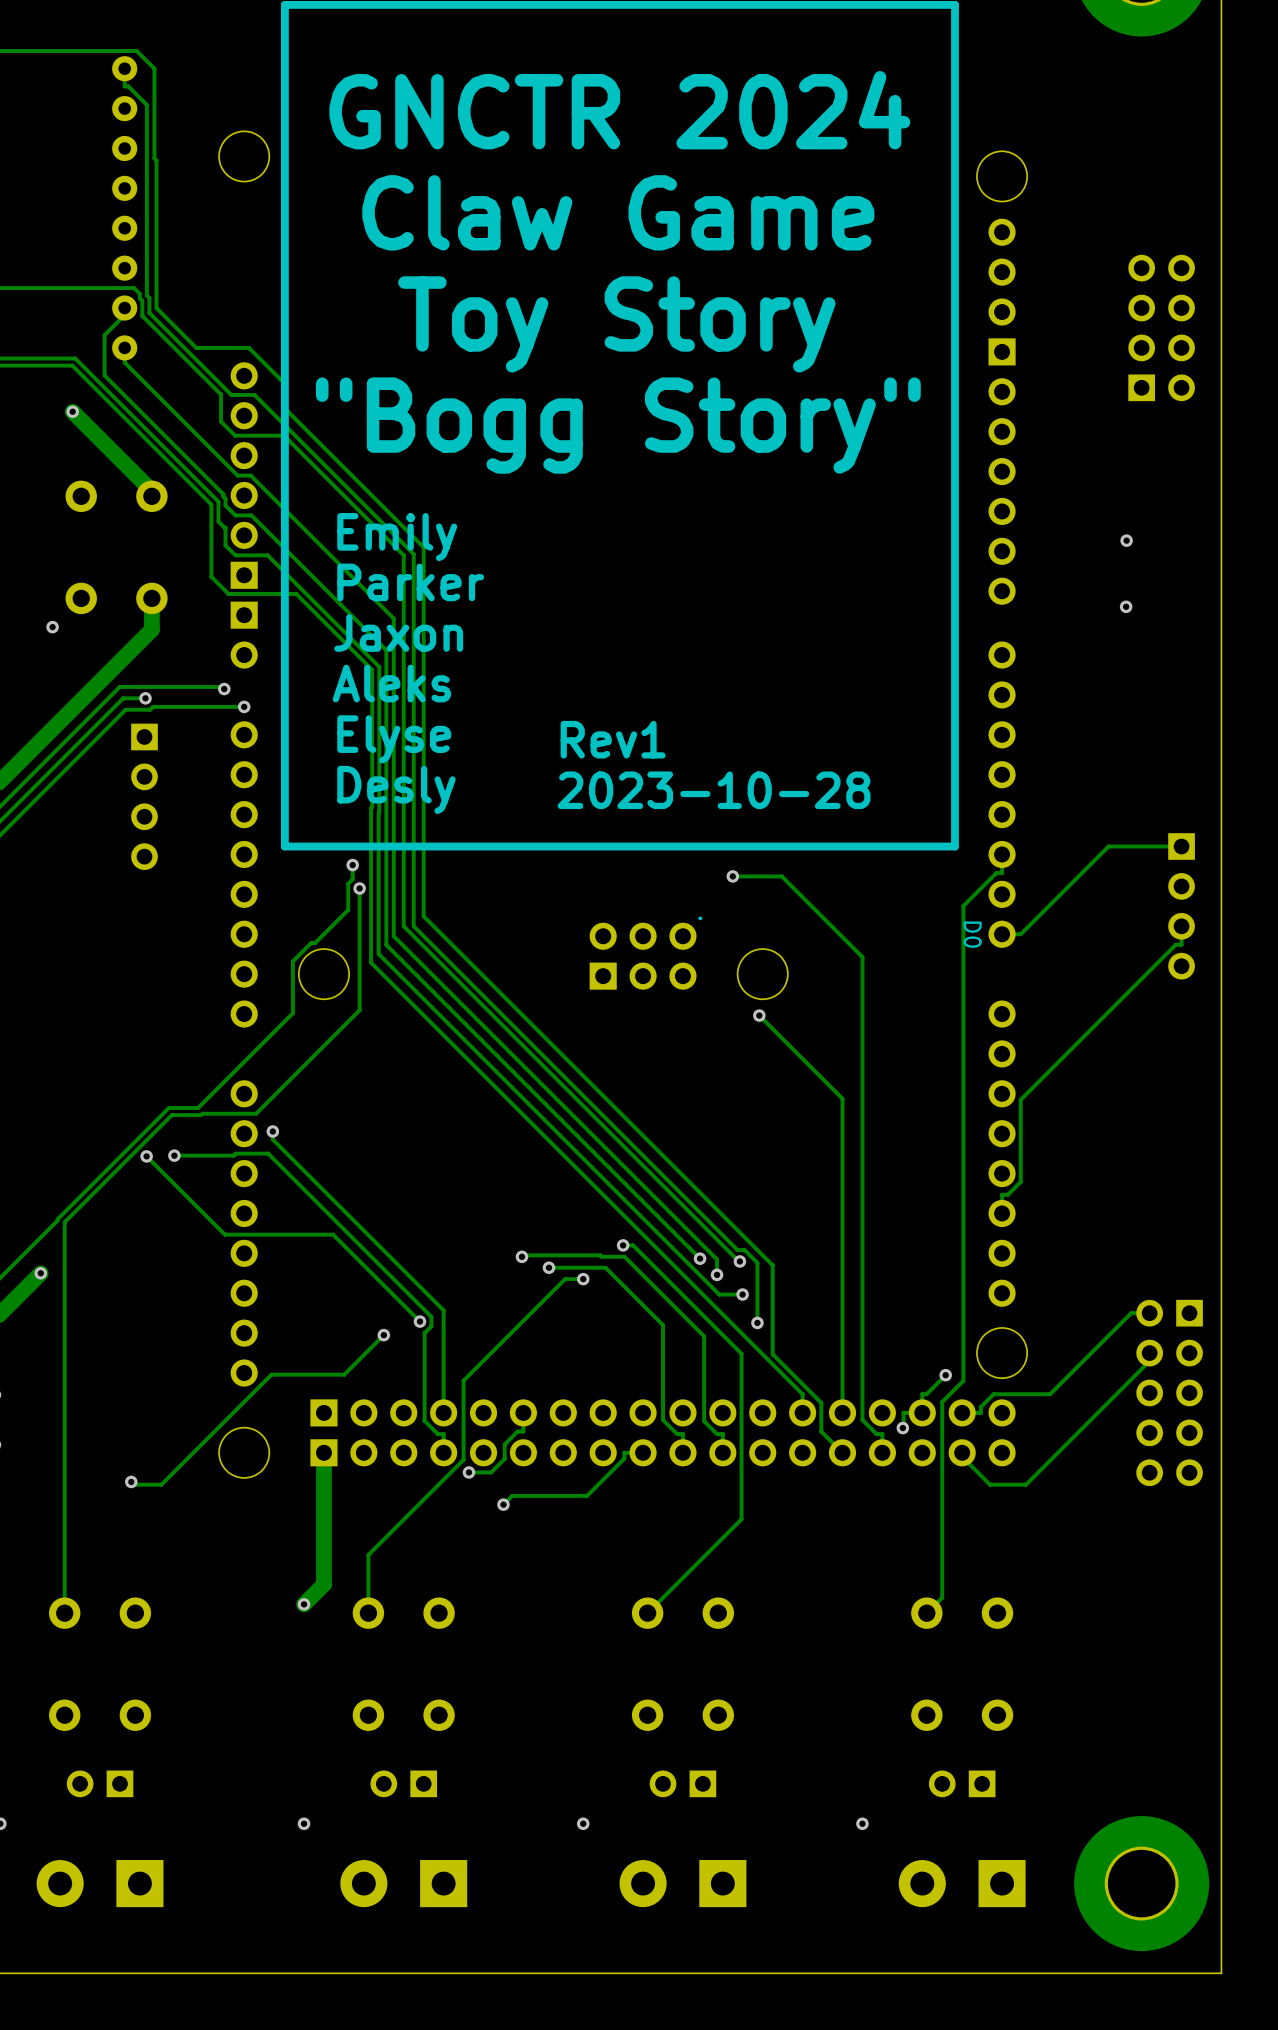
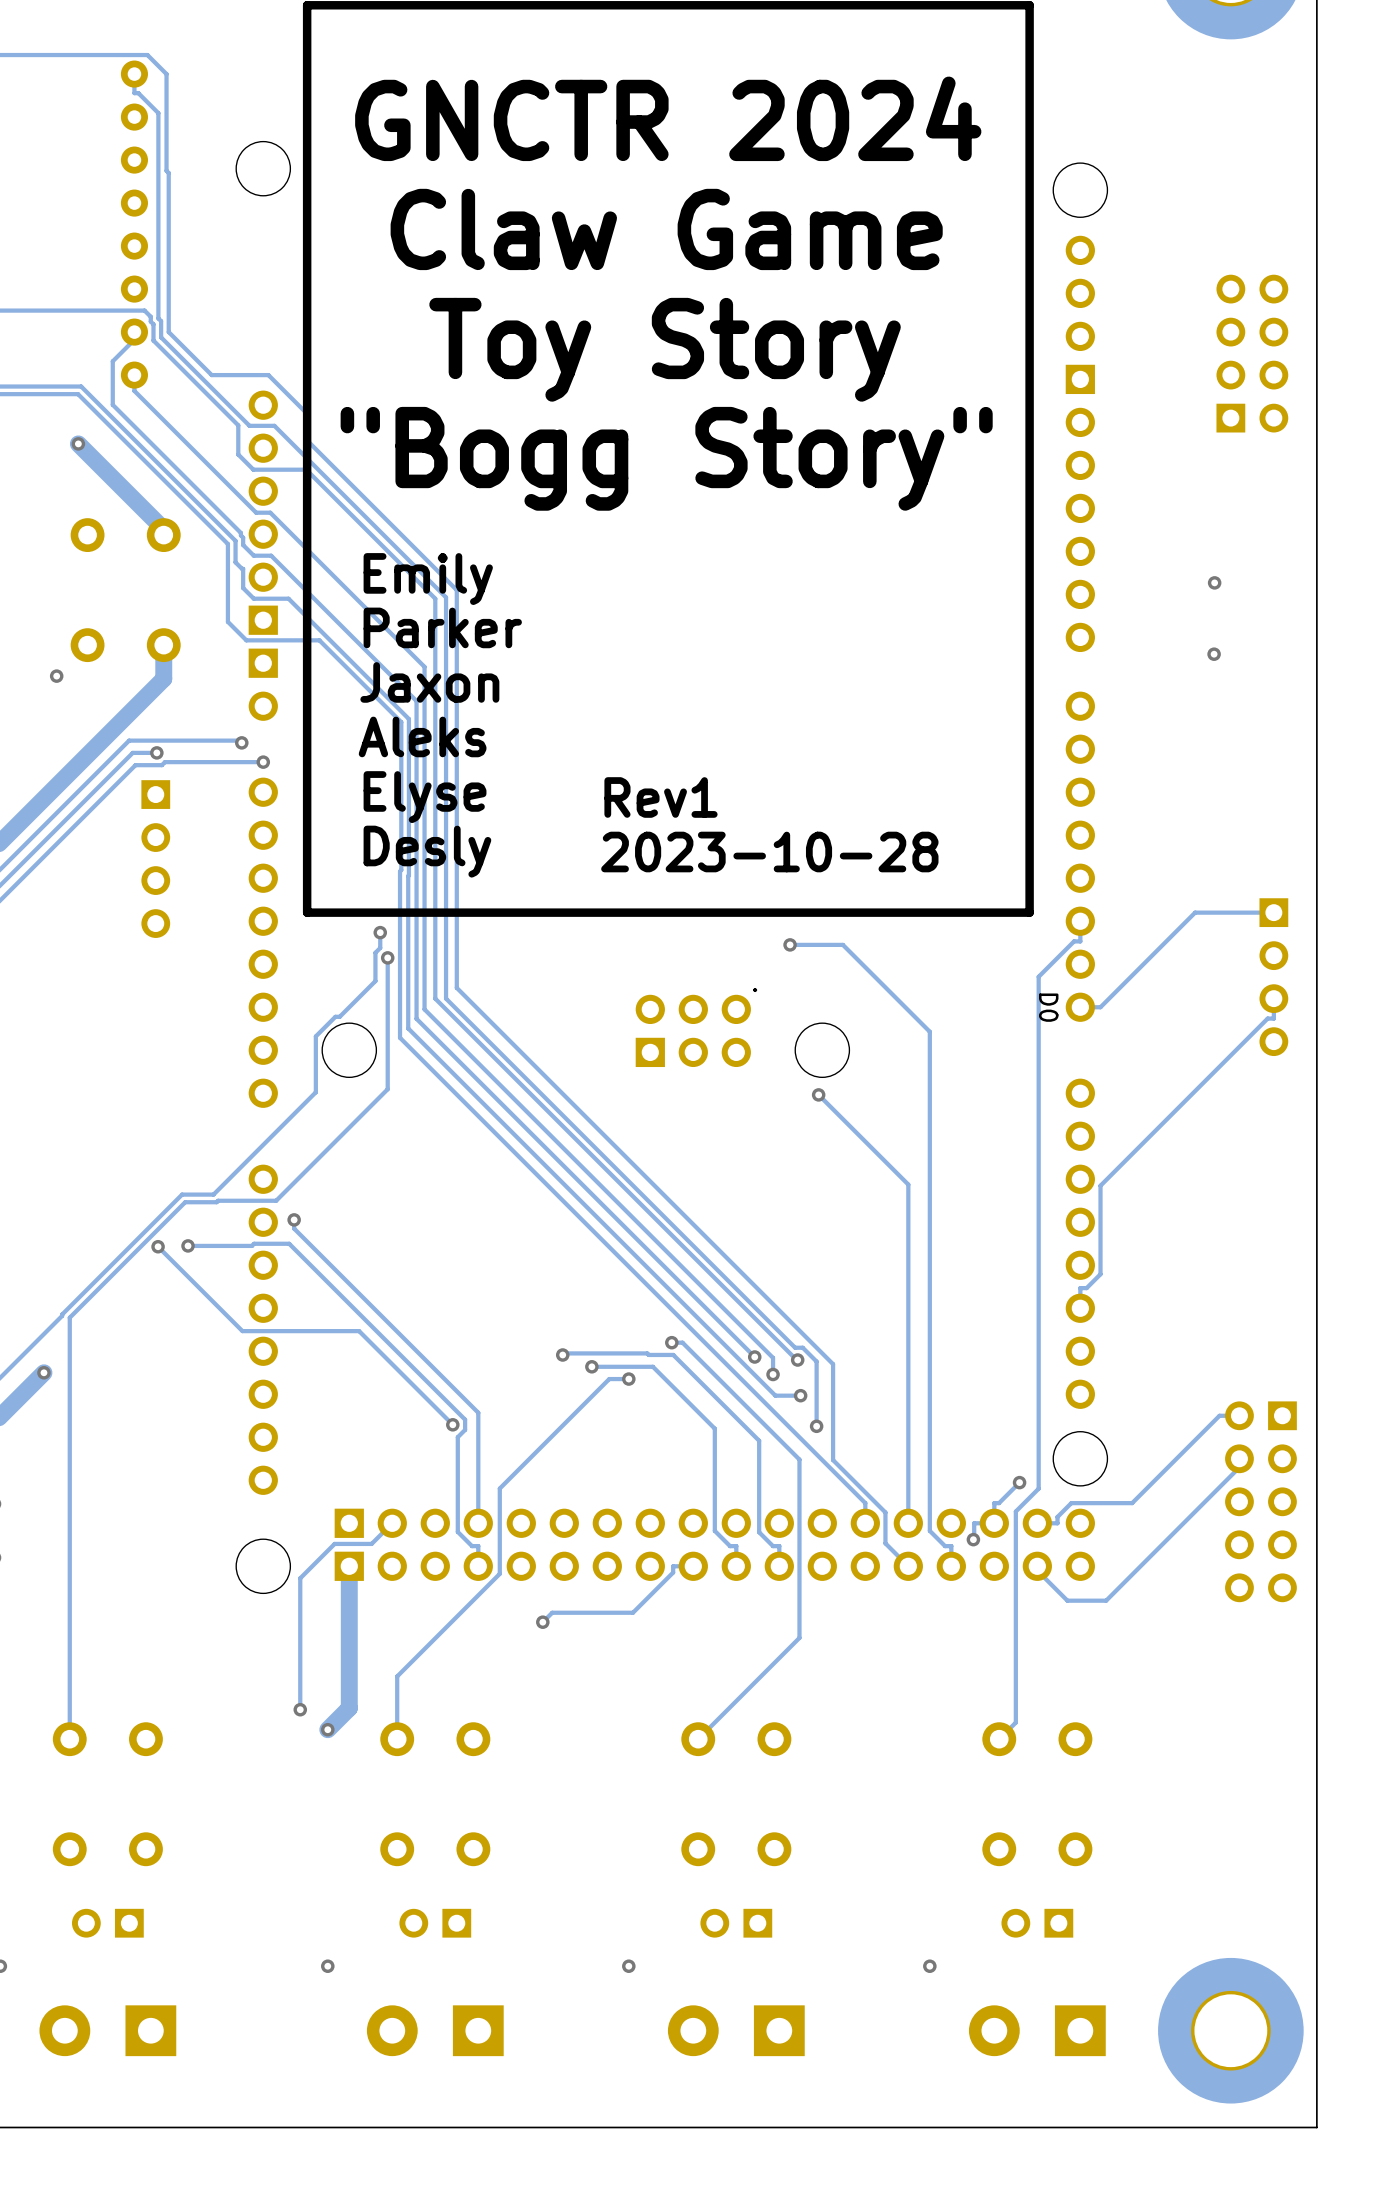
track: (383, 1335) (344, 1374) (271, 1374) (161, 1484) (134, 1484) (131, 1481) -> none
via: (383, 1335) -> none
track: none -> (392, 1523) (371, 1543) (334, 1543) (300, 1578) (300, 1709)
track: (523, 1412) (523, 1431) (517, 1431) (504, 1444) (504, 1458) (491, 1472) (468, 1472) -> none
via: (468, 1472) -> none
via: (131, 1481) -> none
via: none -> (300, 1709)

